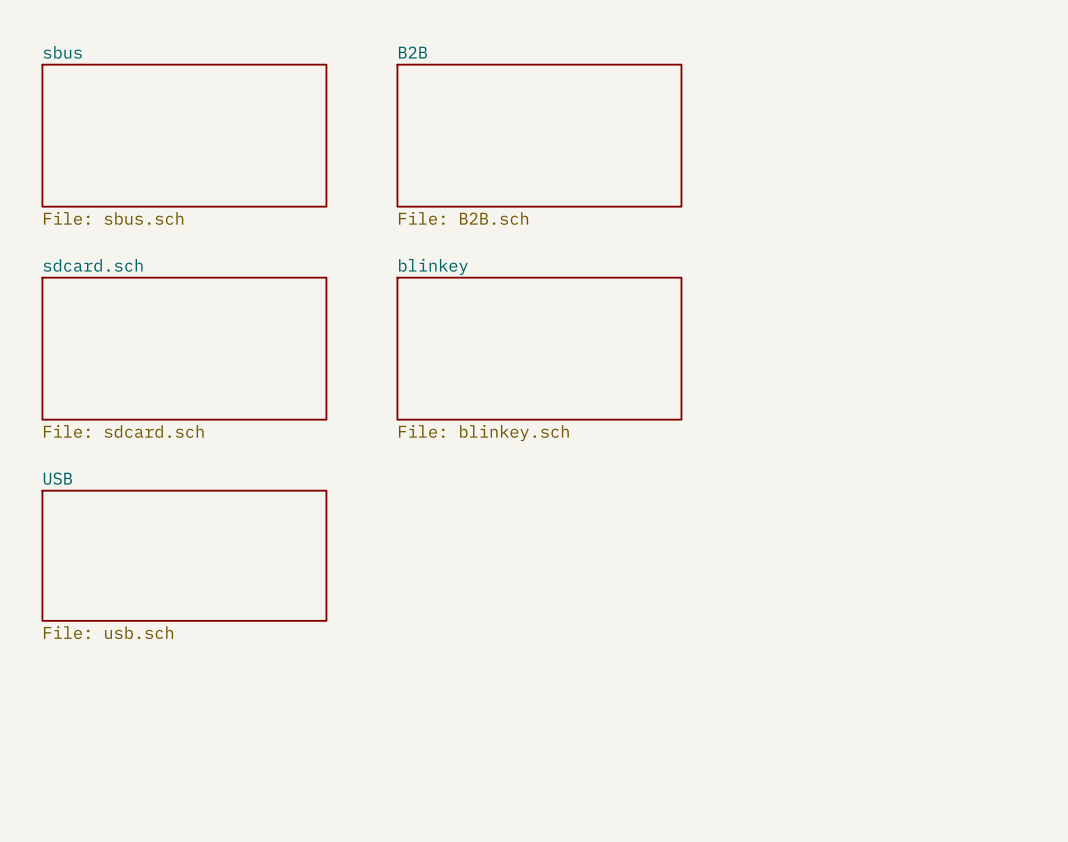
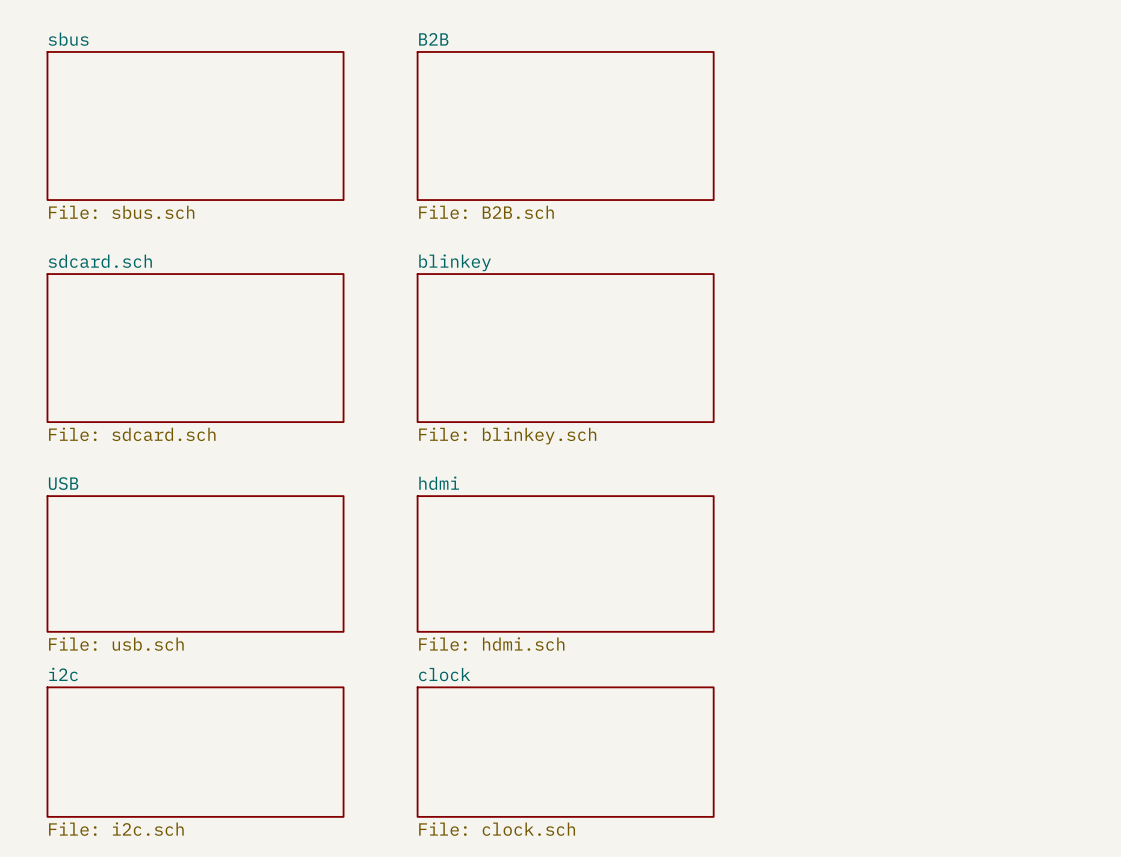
sheet hdmi: none -> File: hdmi.sch (565, 563)
sheet i2c: none -> File: i2c.sch (195, 752)
sheet clock: none -> File: clock.sch (565, 752)

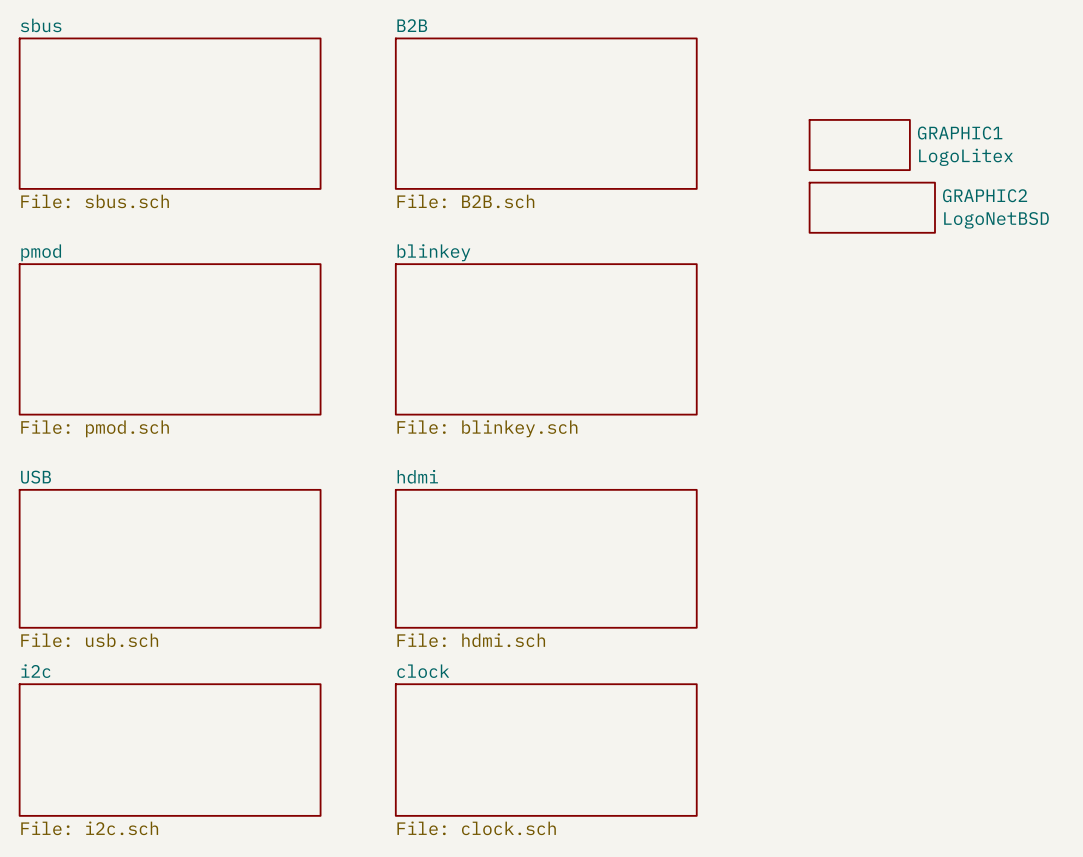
GRAPHIC1: none -> LogoLitex (859, 145)
GRAPHIC2: none -> LogoNetBSD (872, 207)
sheet sdcard.sch name: sdcard.sch (100, 261) -> pmod (41, 252)
sheet sdcard.sch value: File: sdcard.sch (132, 434) -> File: pmod.sch (95, 428)

